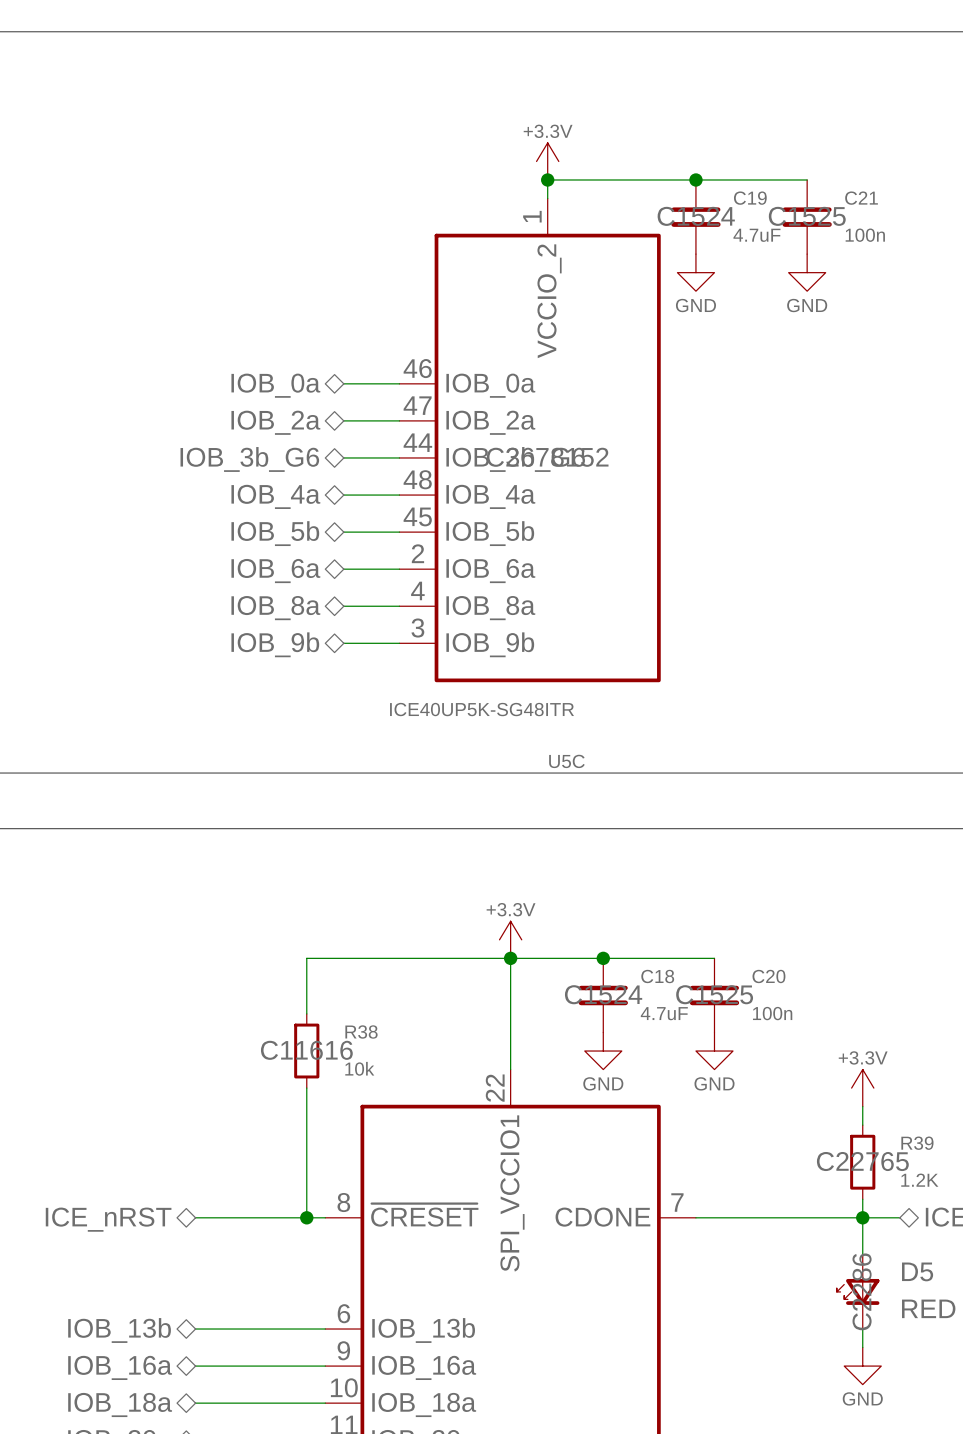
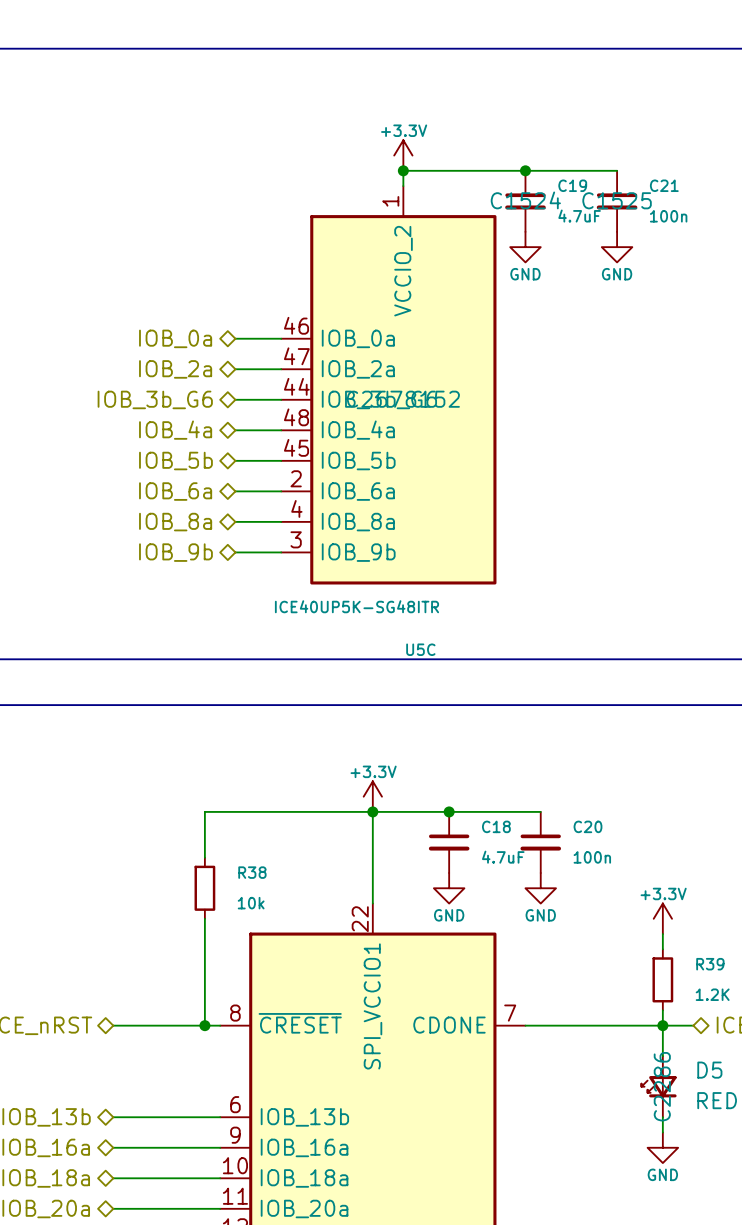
C18 text: C1524 (603, 994) -> none
C20 text: C1525 (714, 994) -> none
R38 text: C11616 (306, 1050) -> none
R39 text: C22765 (862, 1161) -> none

